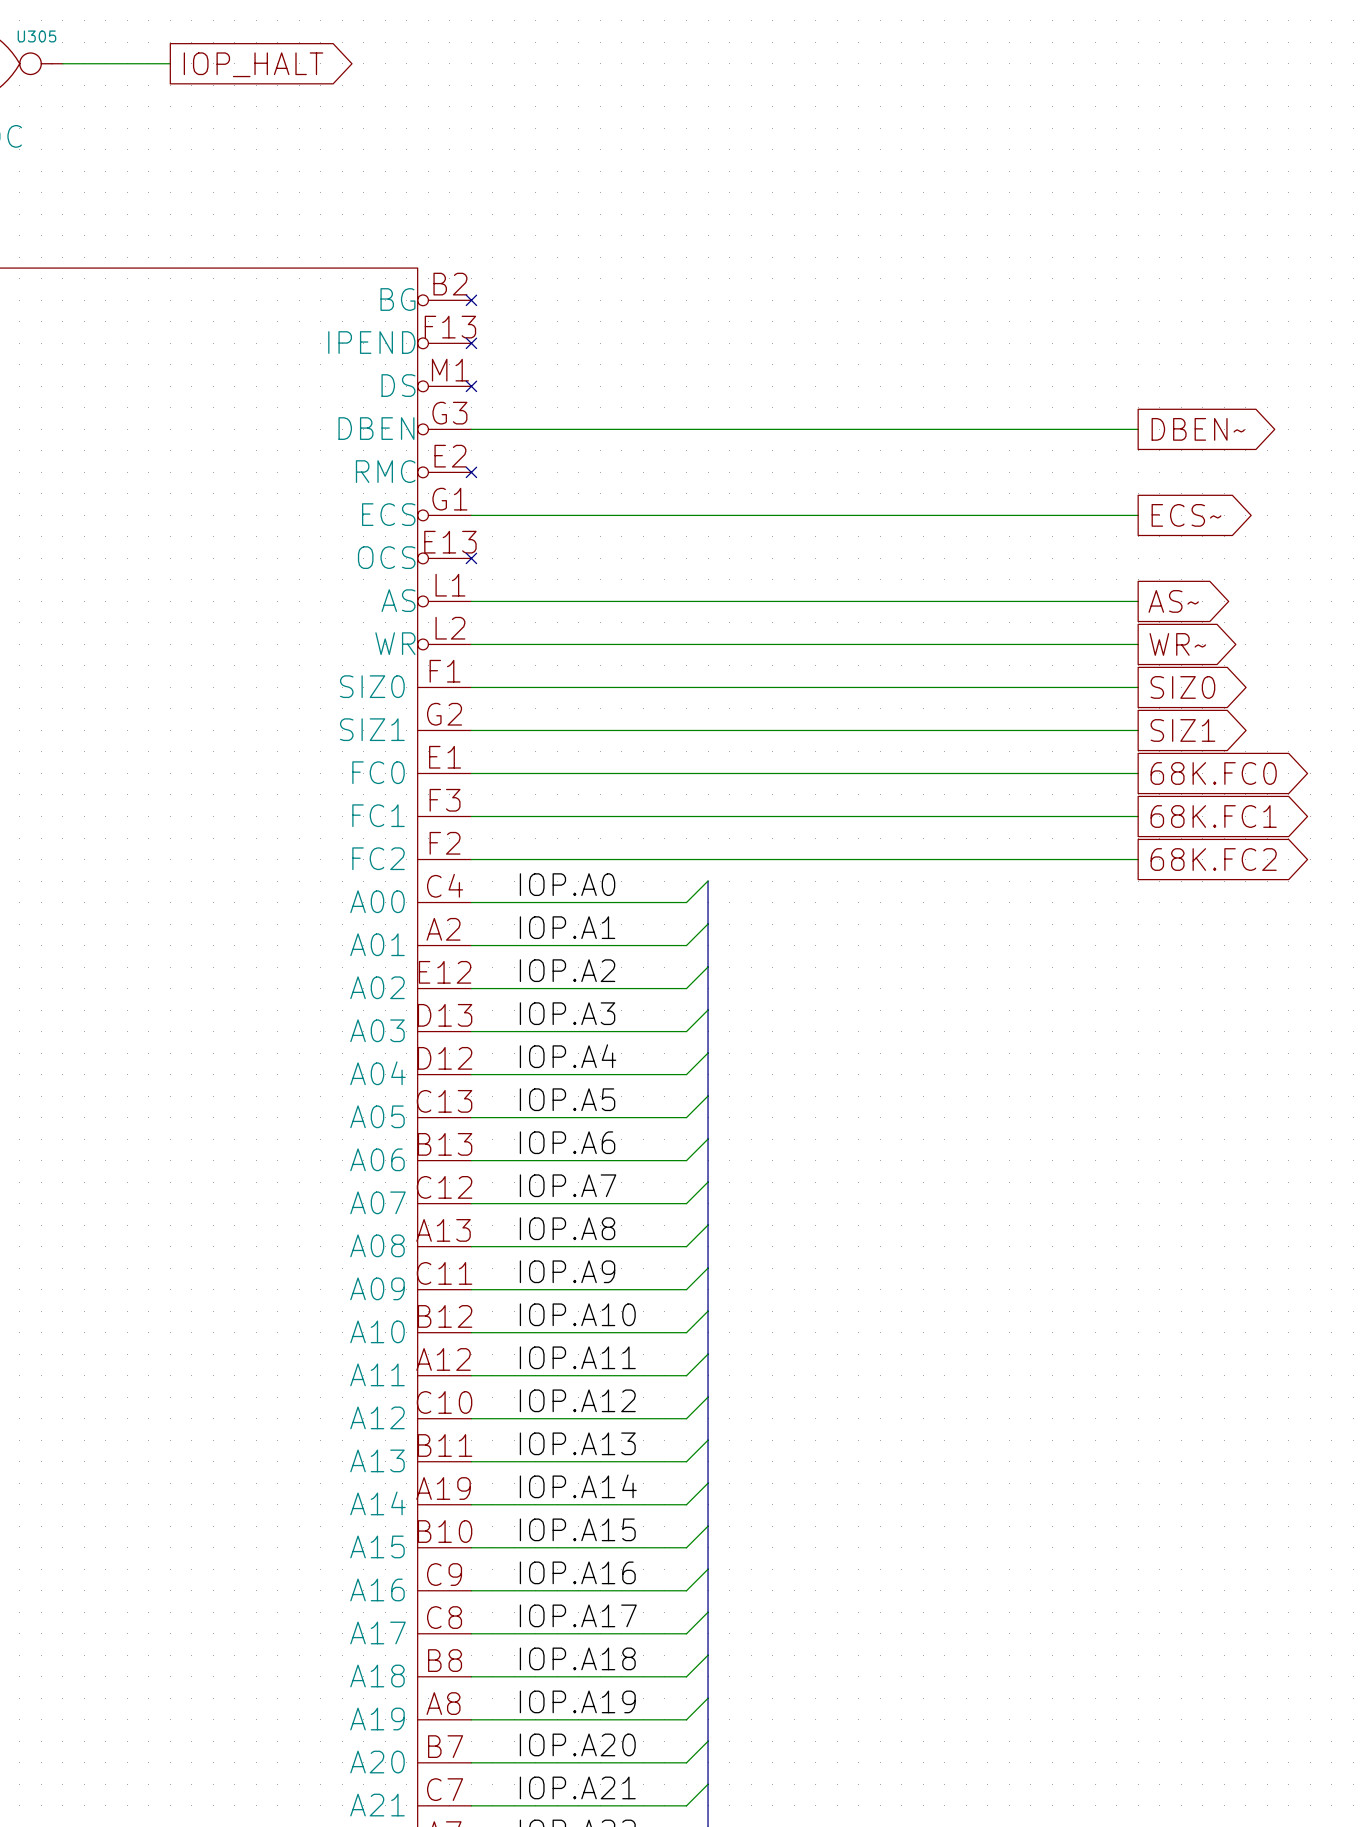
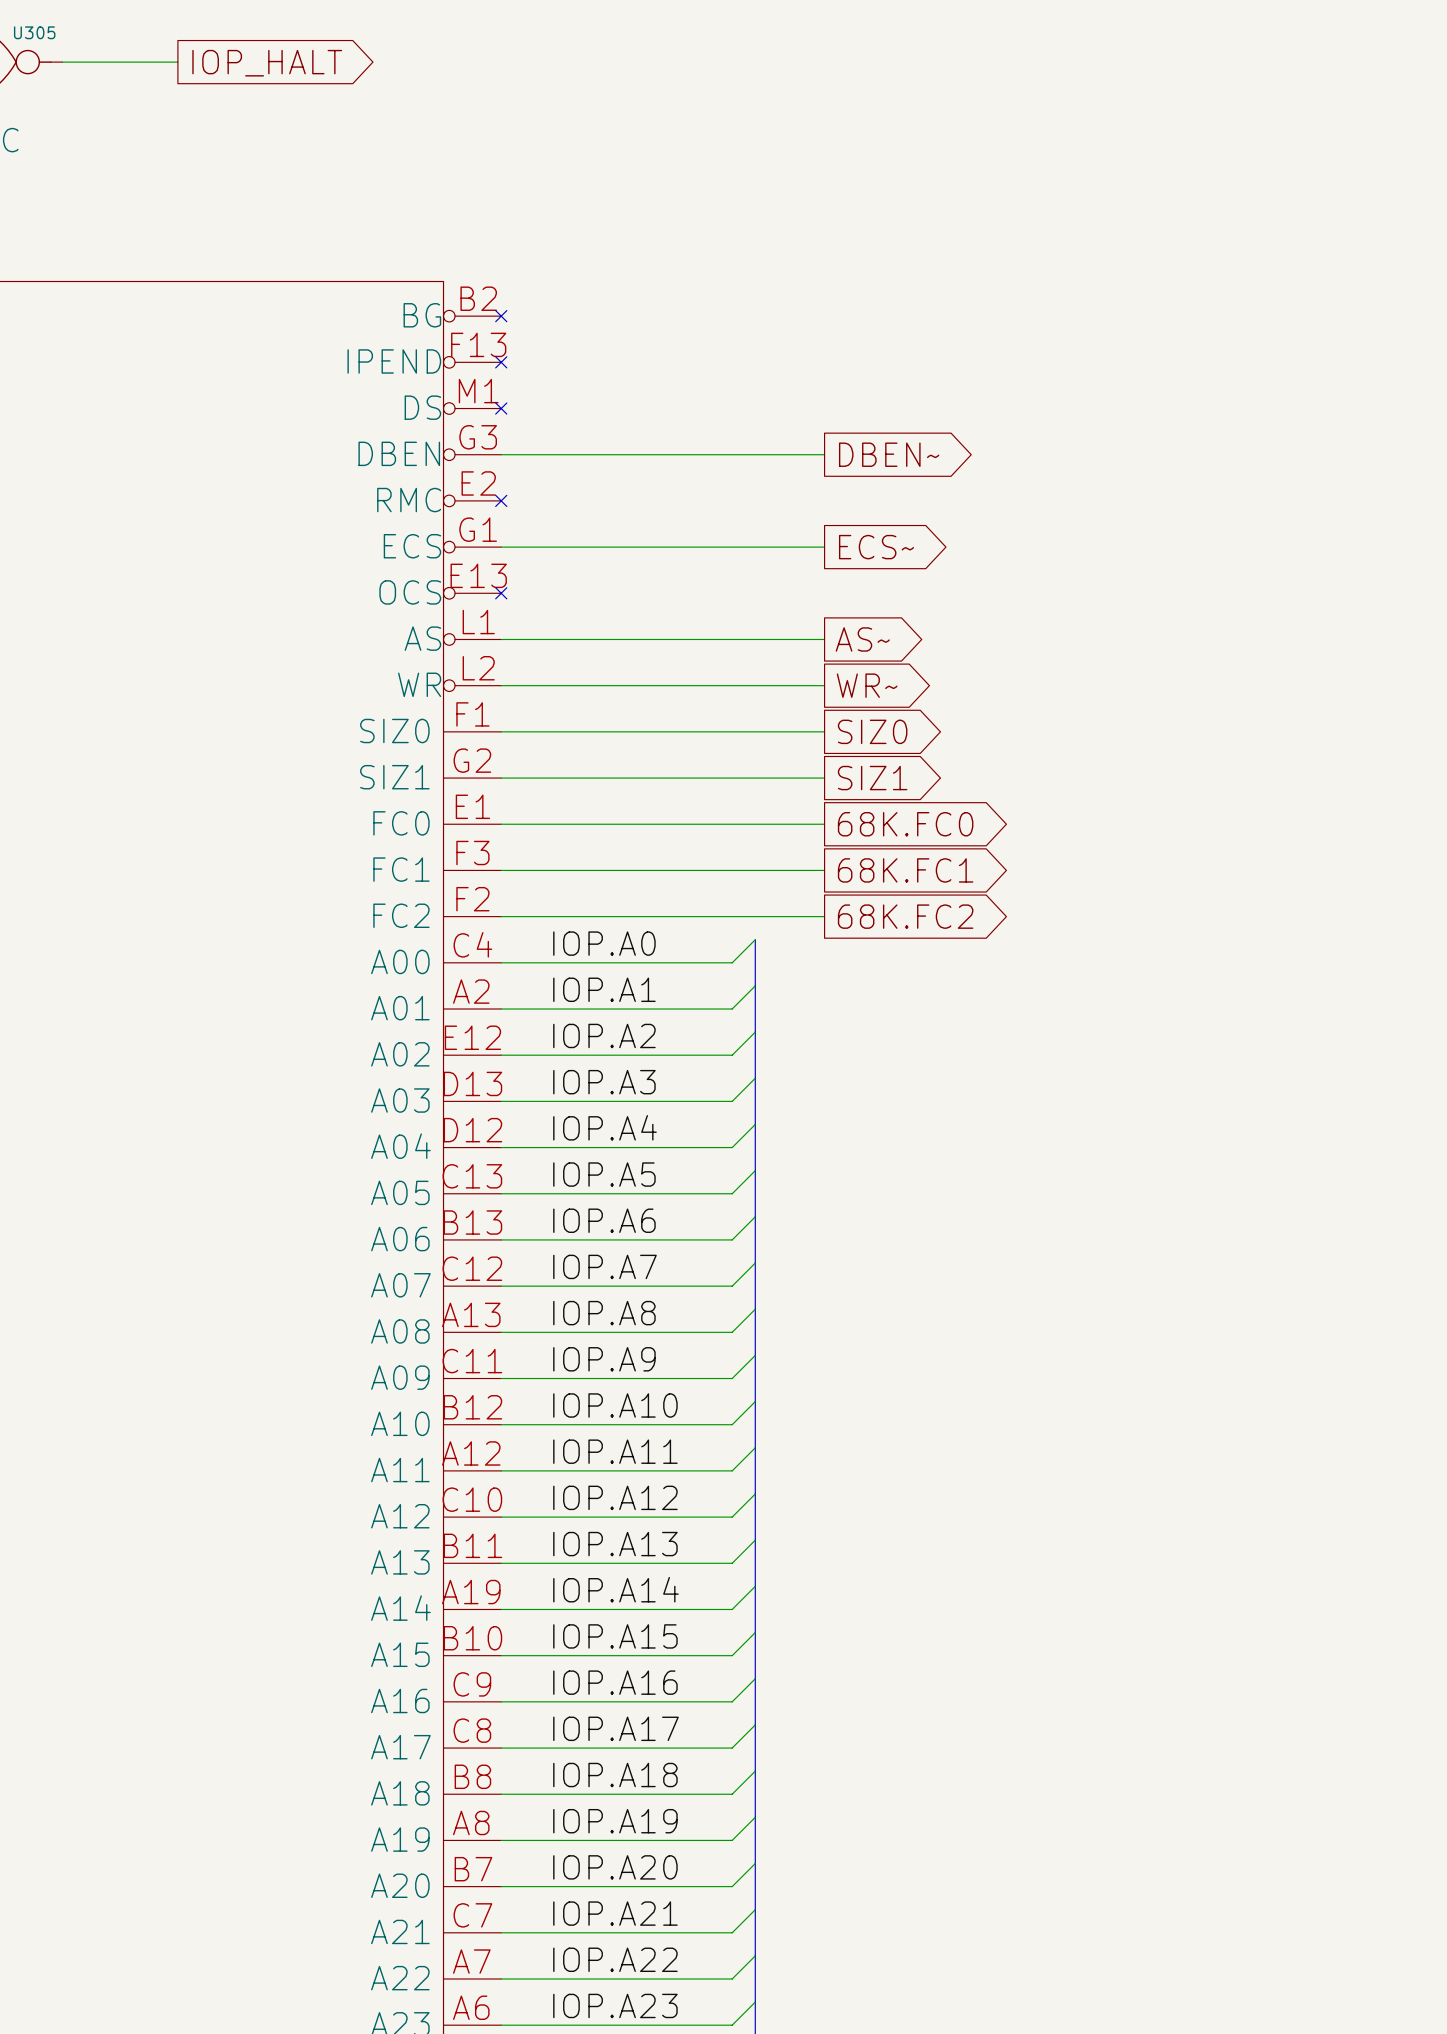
wire: (772, 429) (1138, 429) -> none
global label: none -> DBEN~ (889, 454)
global label: DBEN~ (1198, 429) -> none
wire: (772, 515) (1138, 515) -> none
global label: none -> ECS~ (876, 547)
global label: ECS~ (1186, 515) -> none
wire: (772, 601) (1138, 601) -> none
global label: none -> AS~ (862, 639)
global label: AS~ (1173, 601) -> none
wire: (772, 644) (1138, 644) -> none
global label: none -> WR~ (867, 685)
global label: WR~ (1177, 644) -> none
wire: (772, 687) (1138, 687) -> none
global label: none -> SIZ0 (872, 731)
global label: SIZ0 (1182, 687) -> none
wire: (772, 730) (1138, 730) -> none
global label: none -> SIZ1 (872, 778)
global label: SIZ1 (1182, 730) -> none
wire: (772, 773) (1138, 773) -> none
global label: none -> 68K.FC0 (905, 824)
global label: 68K.FC0 (1213, 773) -> none
wire: (772, 816) (1138, 816) -> none
global label: none -> 68K.FC1 (905, 870)
global label: 68K.FC1 (1213, 816) -> none
wire: (772, 859) (1138, 859) -> none
global label: none -> 68K.FC2 (905, 916)
global label: 68K.FC2 (1213, 859) -> none

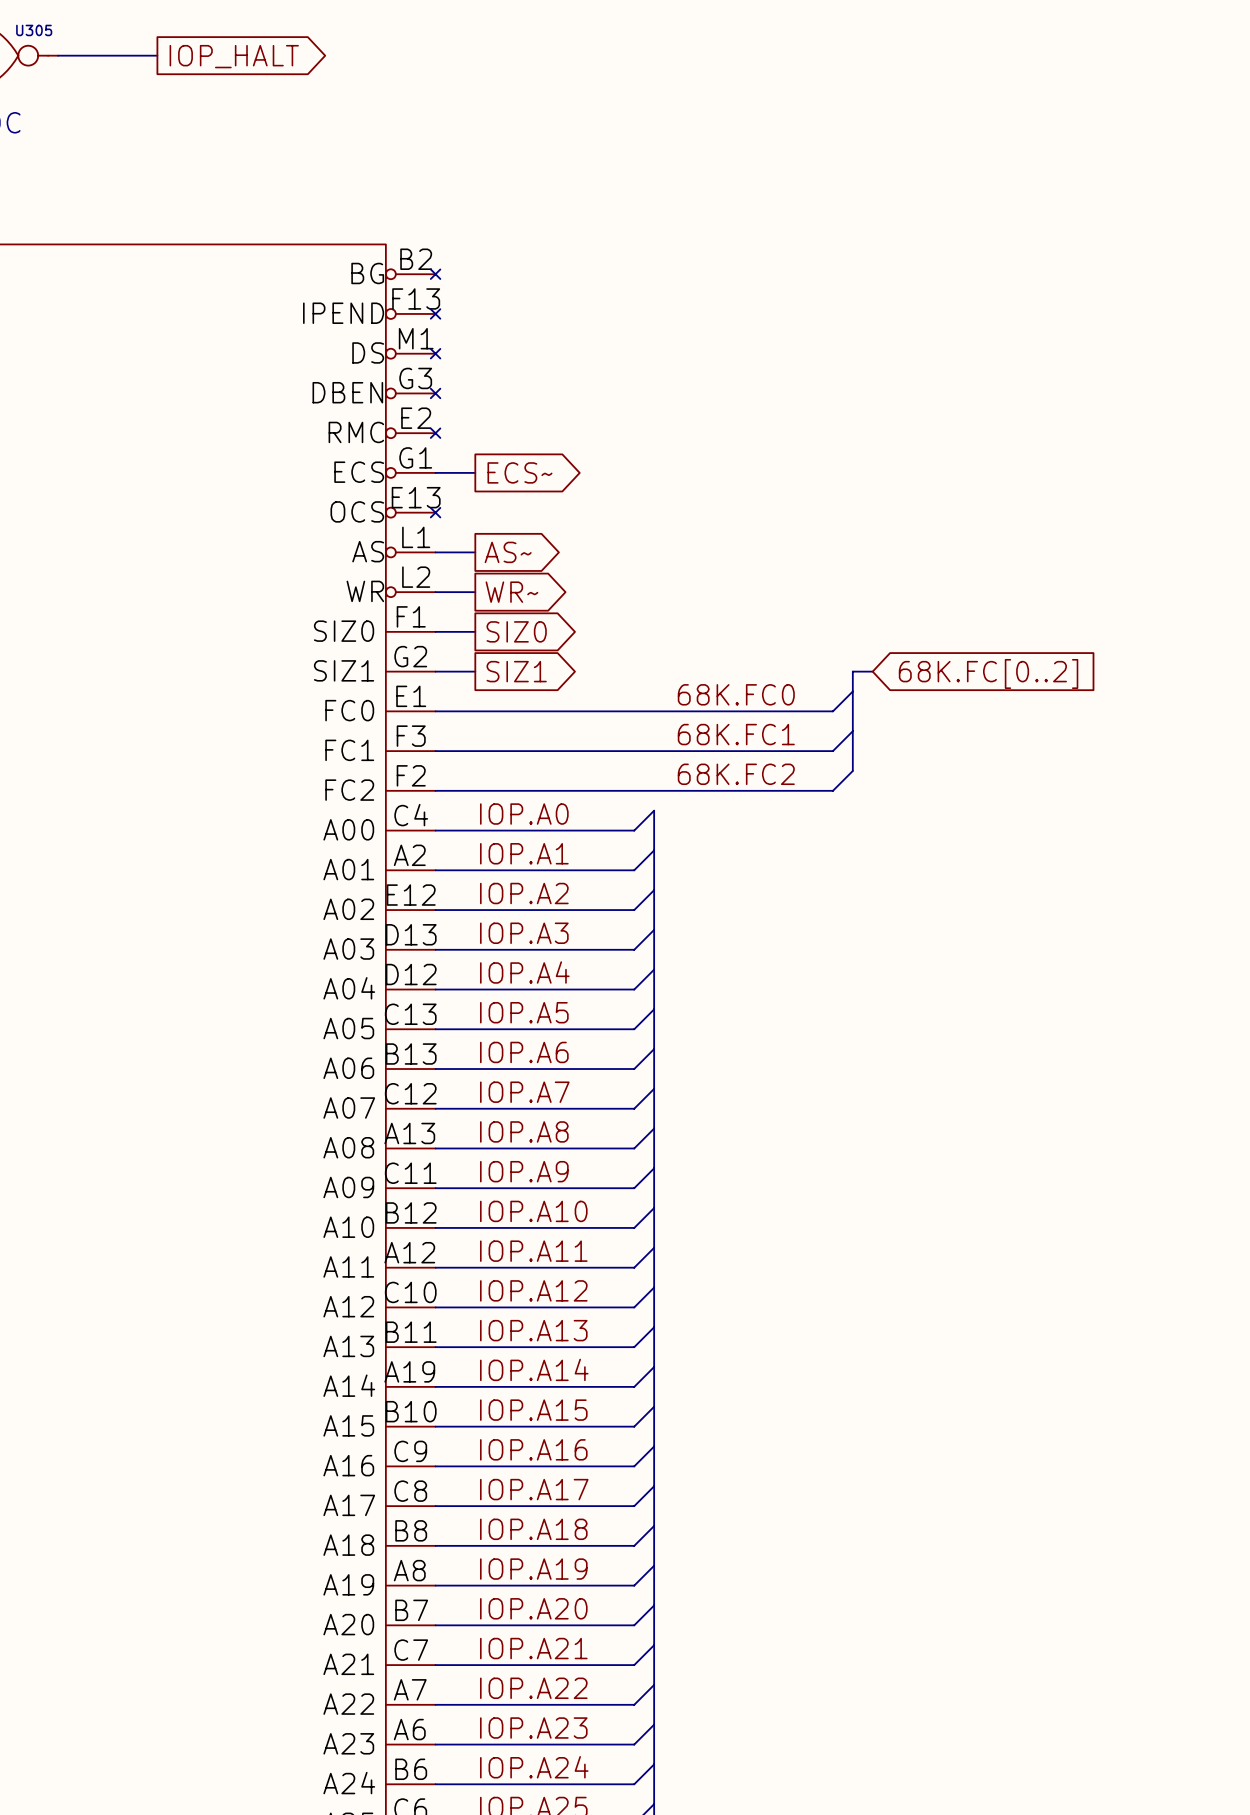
wire: (501, 454) (824, 454) -> none
no-connect mark: none -> (435, 393)
global label: DBEN~ (889, 454) -> none
wire: (547, 547) (824, 547) -> none
global label: none -> ECS~ (519, 472)
global label: ECS~ (876, 547) -> none
wire: (547, 639) (824, 639) -> none
global label: none -> AS~ (508, 552)
global label: AS~ (862, 639) -> none
wire: (547, 685) (824, 685) -> none
global label: none -> WR~ (511, 592)
global label: WR~ (867, 685) -> none
wire: (547, 731) (824, 731) -> none
global label: none -> SIZ0 (516, 631)
global label: SIZ0 (872, 731) -> none
wire: (547, 778) (824, 778) -> none
global label: none -> SIZ1 (516, 671)
global label: SIZ1 (872, 778) -> none
bus: none -> (872, 671) (852, 671) (852, 770)
wire: none -> (852, 691) (832, 711) (713, 711)
label: none -> 68K.FC0 (736, 694)
global label shape: output (905, 824) -> input (988, 673)
global label: 68K.FC0 (905, 824) -> 68K.FC[0..2] (988, 673)
wire: none -> (852, 731) (832, 751) (713, 751)
label: none -> 68K.FC1 (736, 734)
global label: 68K.FC1 (905, 870) -> none
wire: none -> (852, 770) (832, 790) (713, 790)
label: none -> 68K.FC2 (736, 774)
global label: 68K.FC2 (905, 916) -> none

